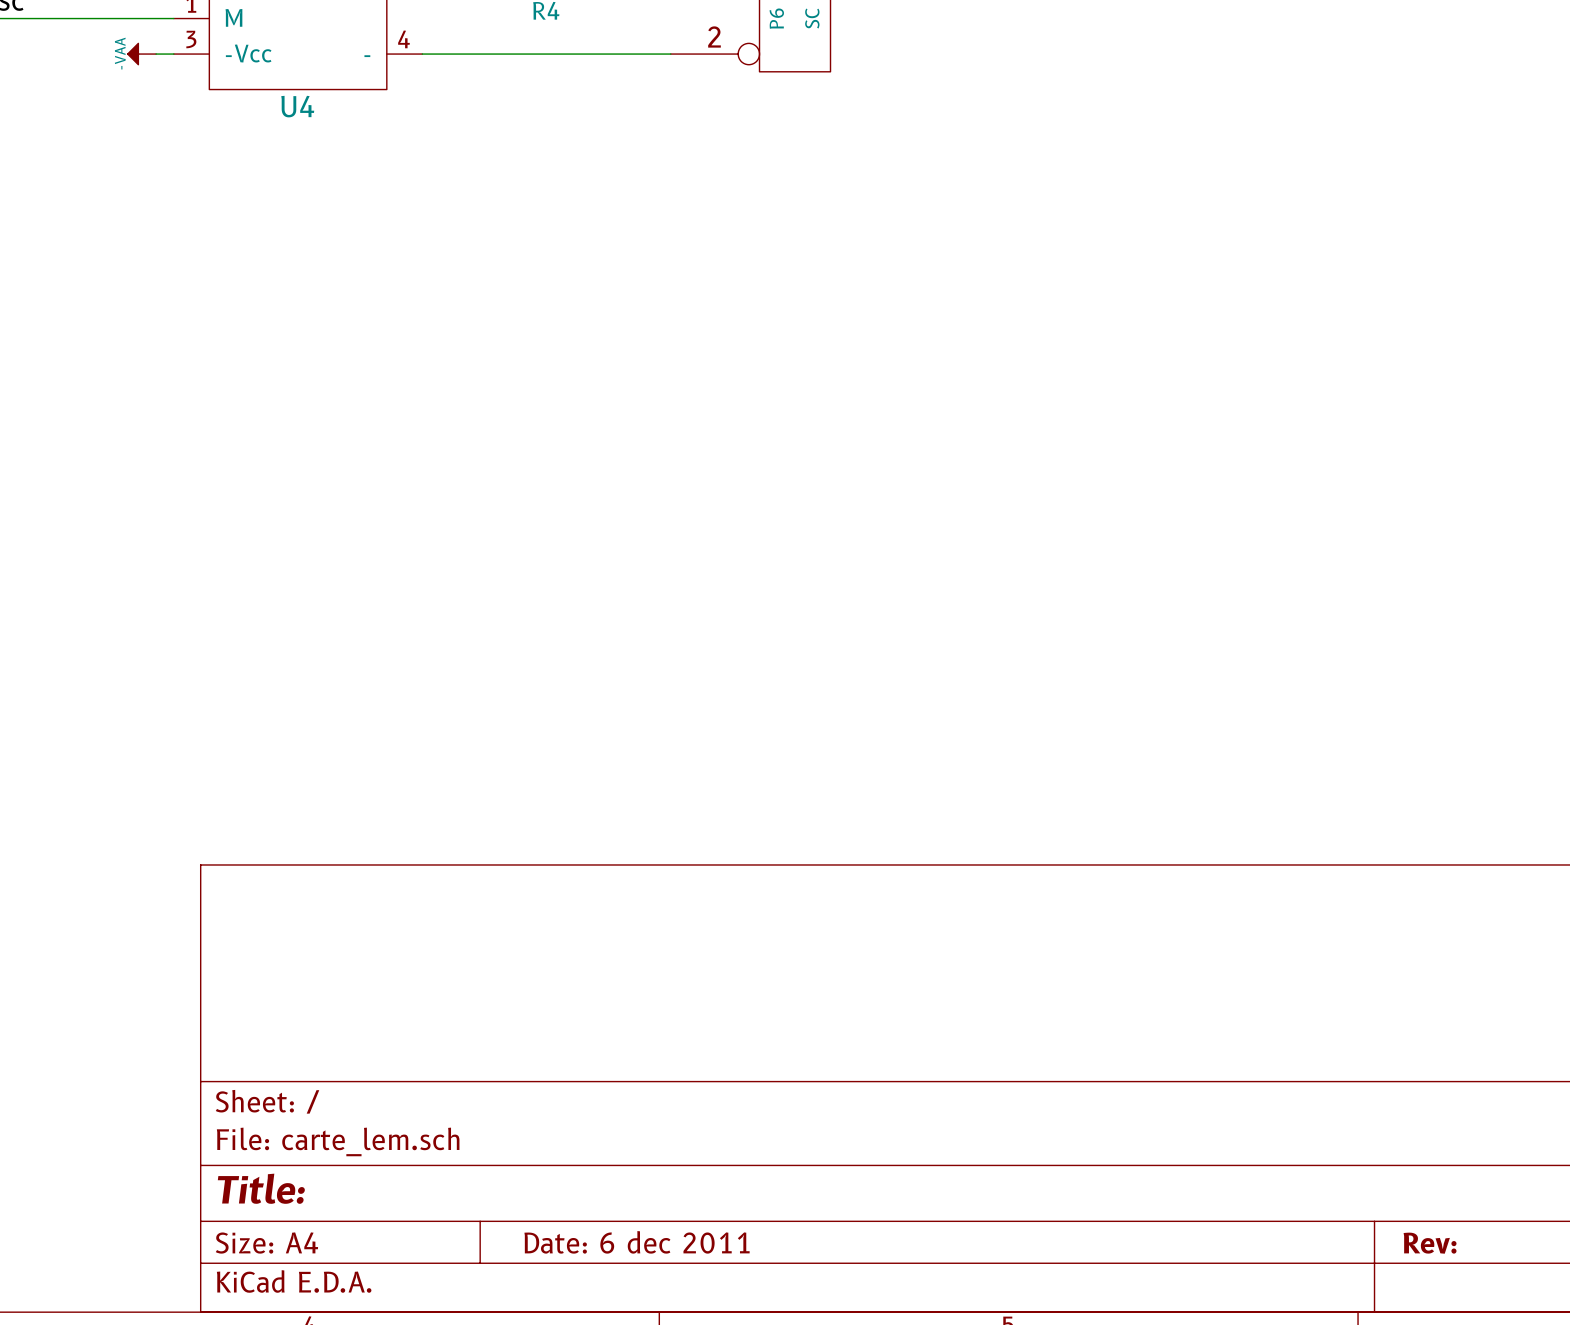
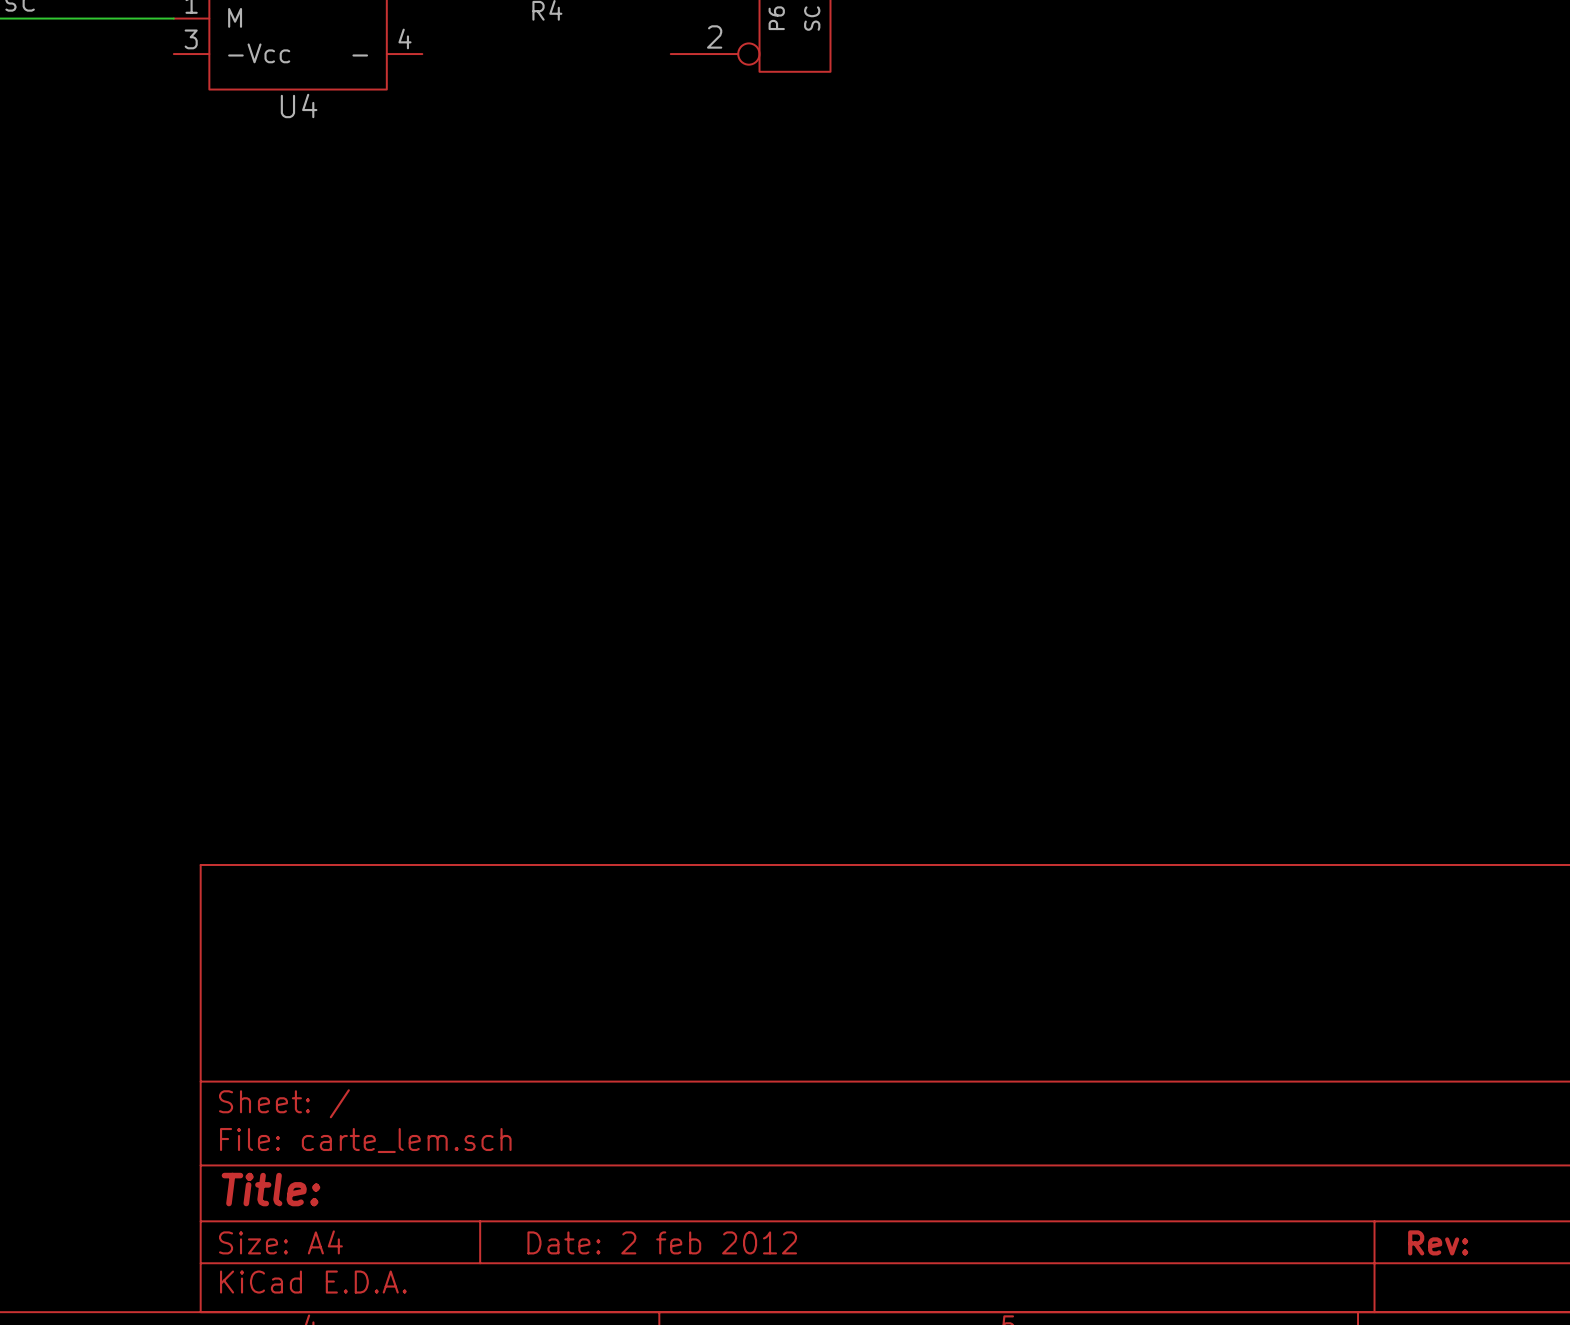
power symbol: -VAA (141, 54) -> none
wire: (156, 54) (173, 54) -> none
wire: (422, 54) (670, 54) -> none
title block: Date: 6 dec 2011 (637, 1242) -> Date: 2 feb 2012 (662, 1242)

